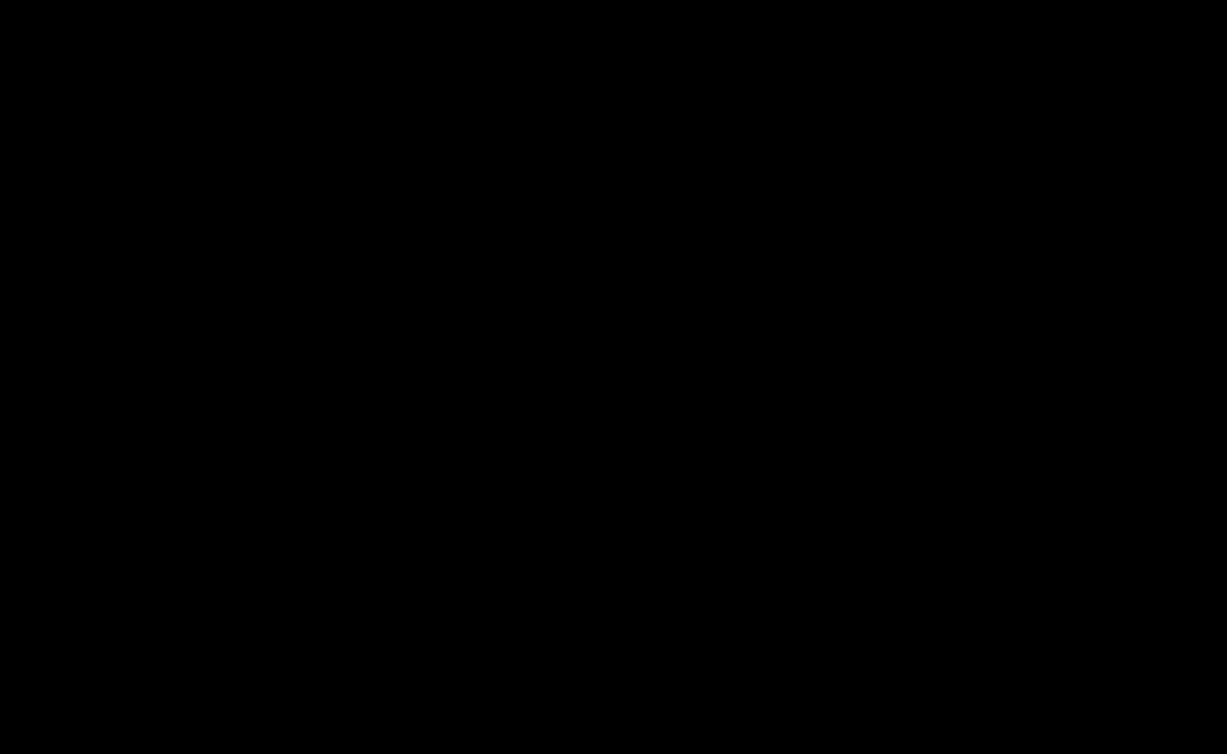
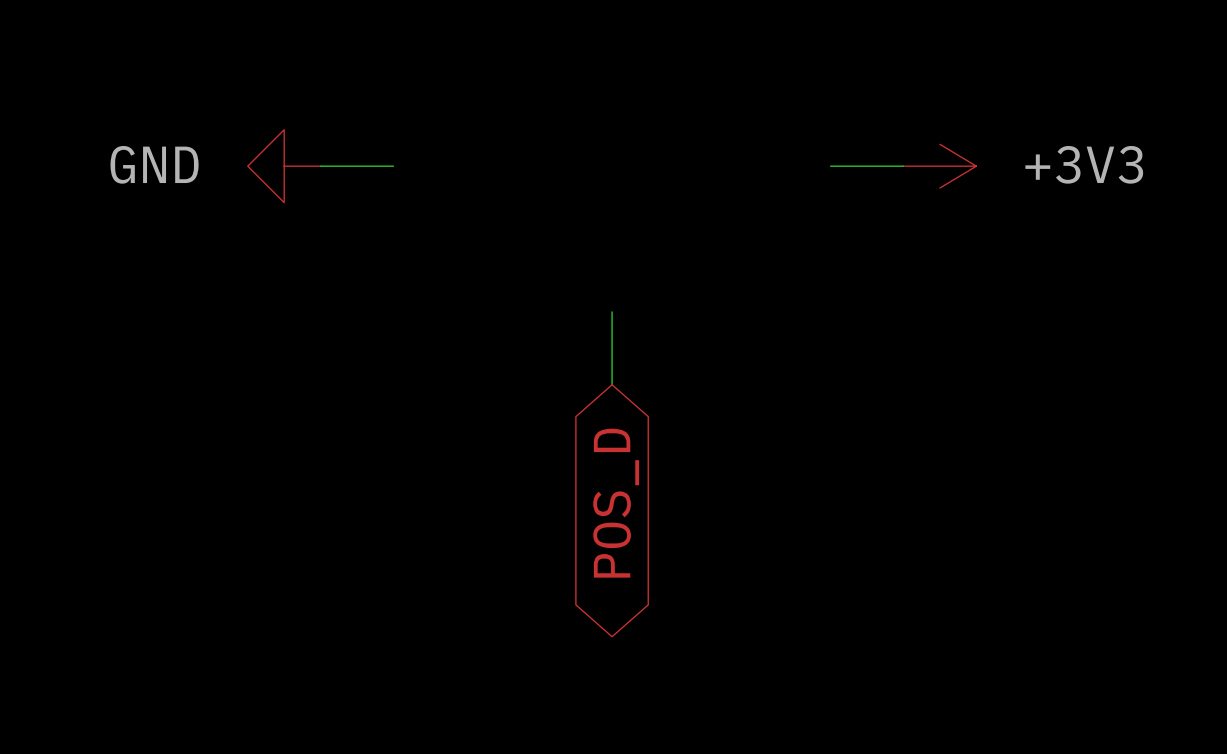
power symbol: none -> GND (284, 166)
wire: none -> (320, 166) (393, 166)
wire: none -> (830, 166) (903, 166)
power symbol: none -> +3V3 (939, 166)
wire: none -> (612, 311) (612, 384)
global label: none -> POS_D (616, 503)

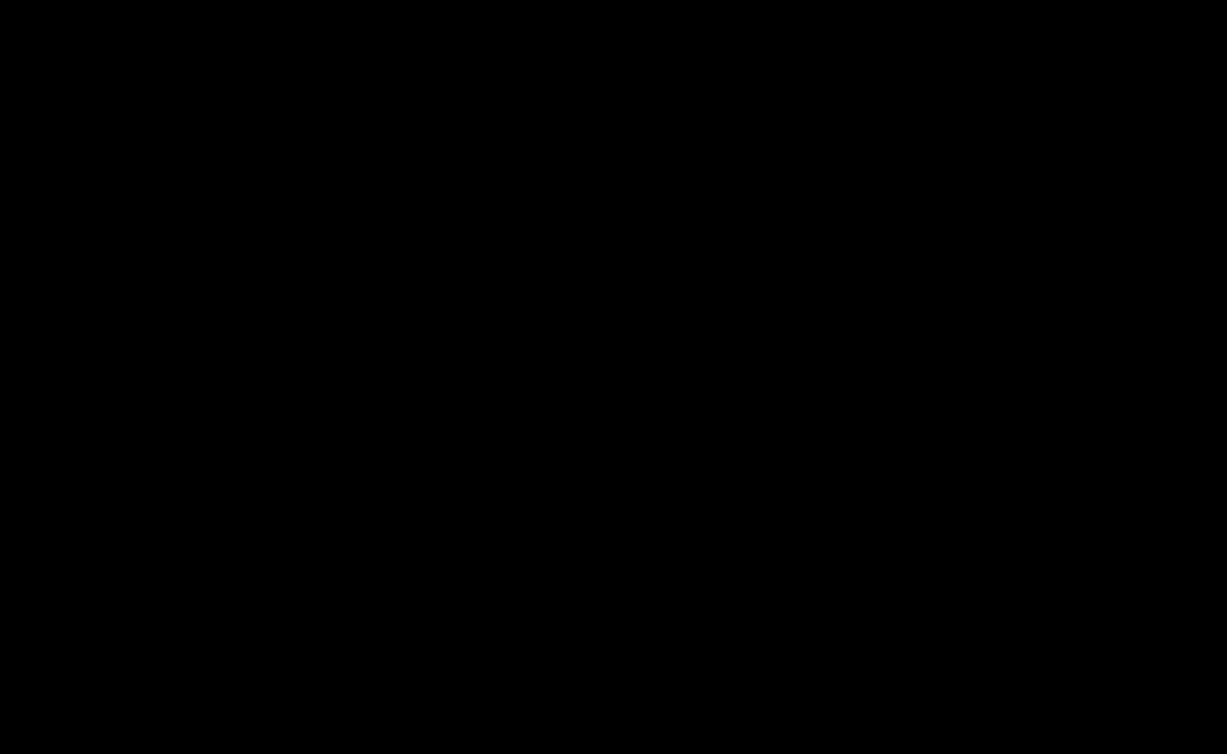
power symbol: GND (284, 166) -> none
wire: (320, 166) (393, 166) -> none
wire: (830, 166) (903, 166) -> none
power symbol: +3V3 (939, 166) -> none
wire: (612, 311) (612, 384) -> none
global label: POS_D (616, 503) -> none

